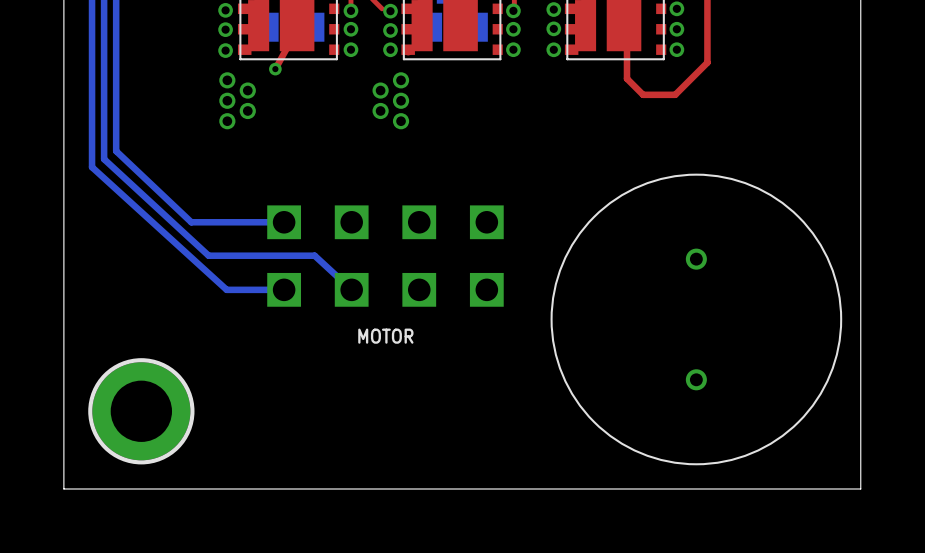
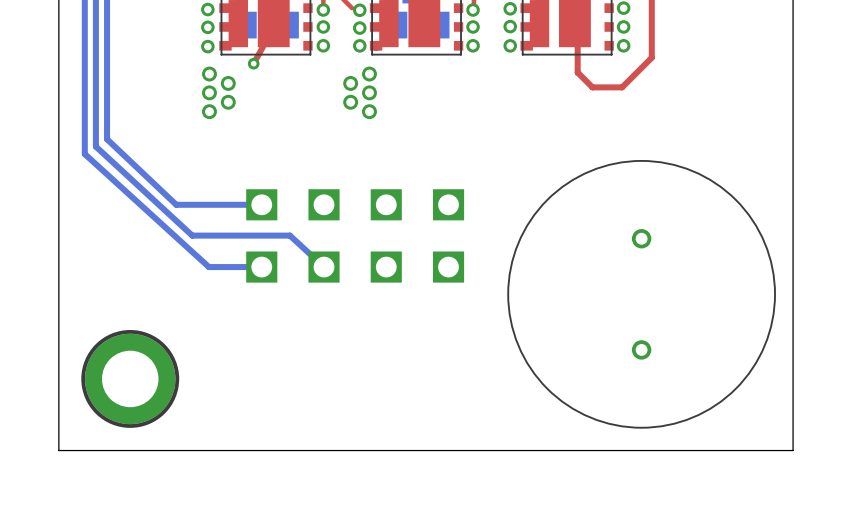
text: MOTOR (385, 336) -> none

